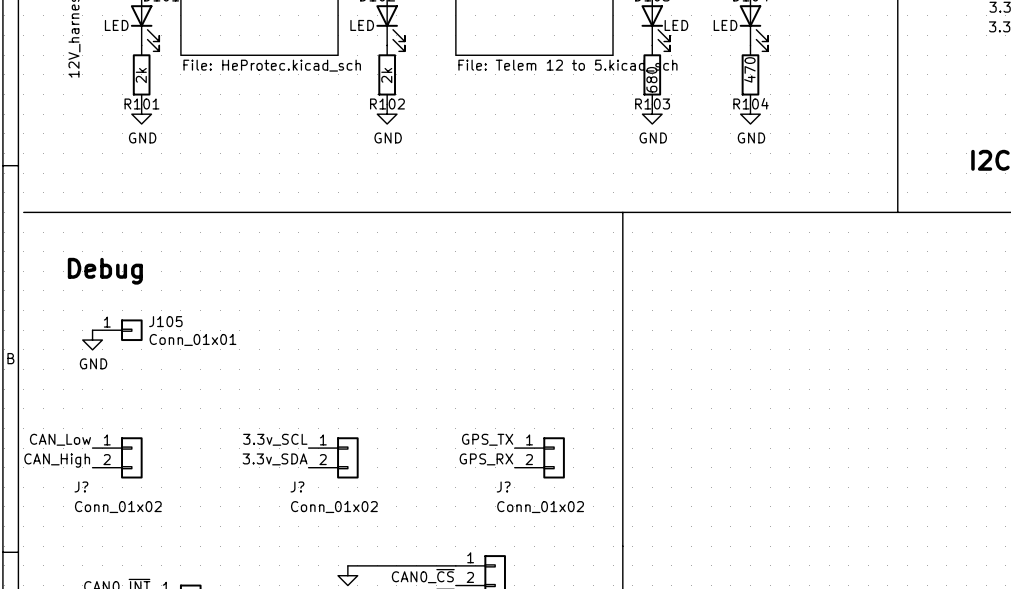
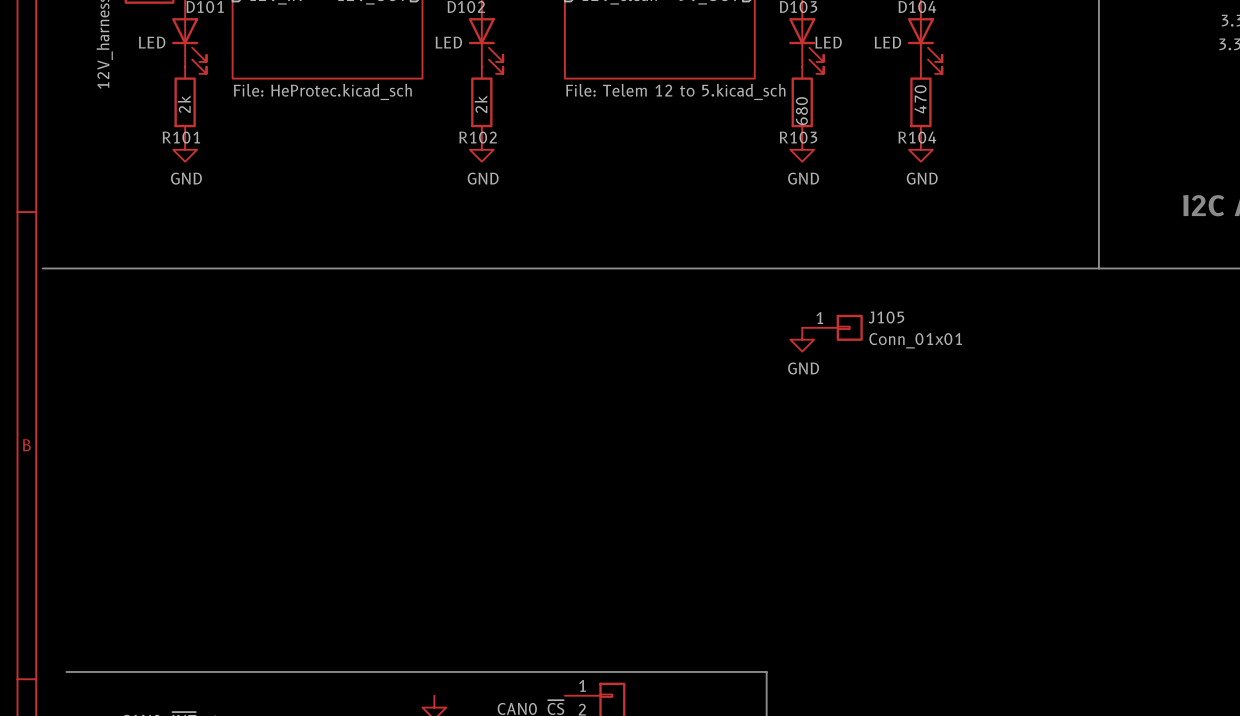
line: (622, 212) (622, 546) -> (66, 671) (766, 671)
text: Debug (105, 271) -> none
power symbol: none -> GND (802, 339)
J105 position: (117, 330) -> (832, 327)
power symbol: GND (92, 340) -> none
label: CAN_Low (60, 439) -> none
label: 3.3v_SCL (275, 439) -> none
label: GPS_TX (487, 439) -> none
J?: Conn_01x02 (117, 457) -> none
J?: Conn_01x02 (333, 457) -> none
J?: Conn_01x02 (539, 457) -> none
label: 3.3v_SDA (275, 459) -> none
label: GPS_RX (486, 459) -> none
label: CAN_High (57, 460) -> none
wire: (347, 565) (455, 565) -> none

